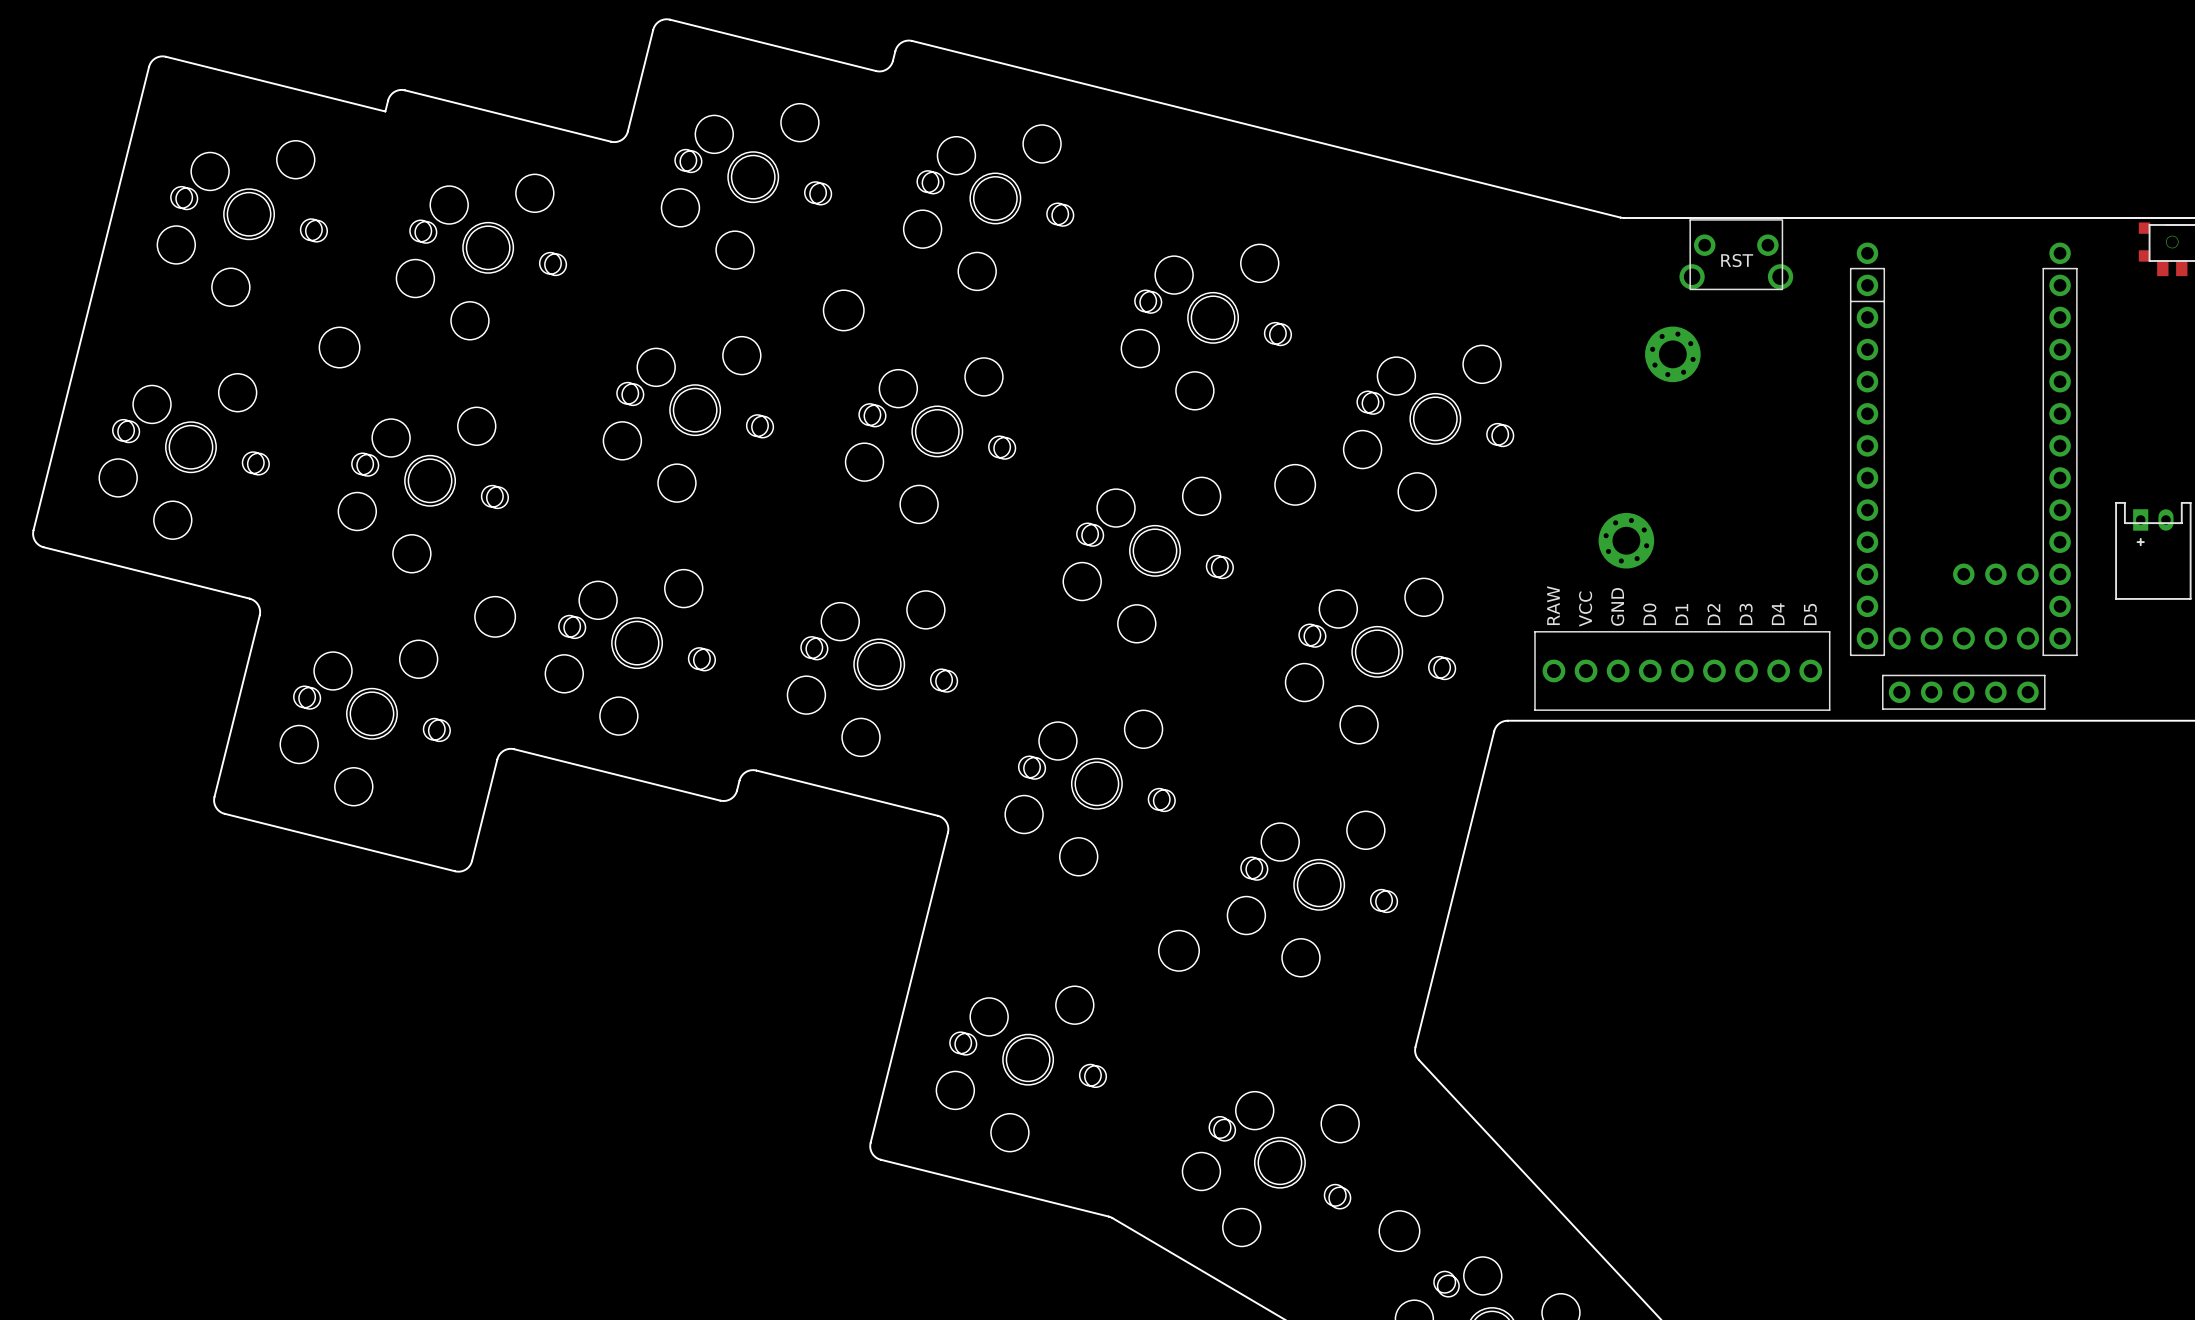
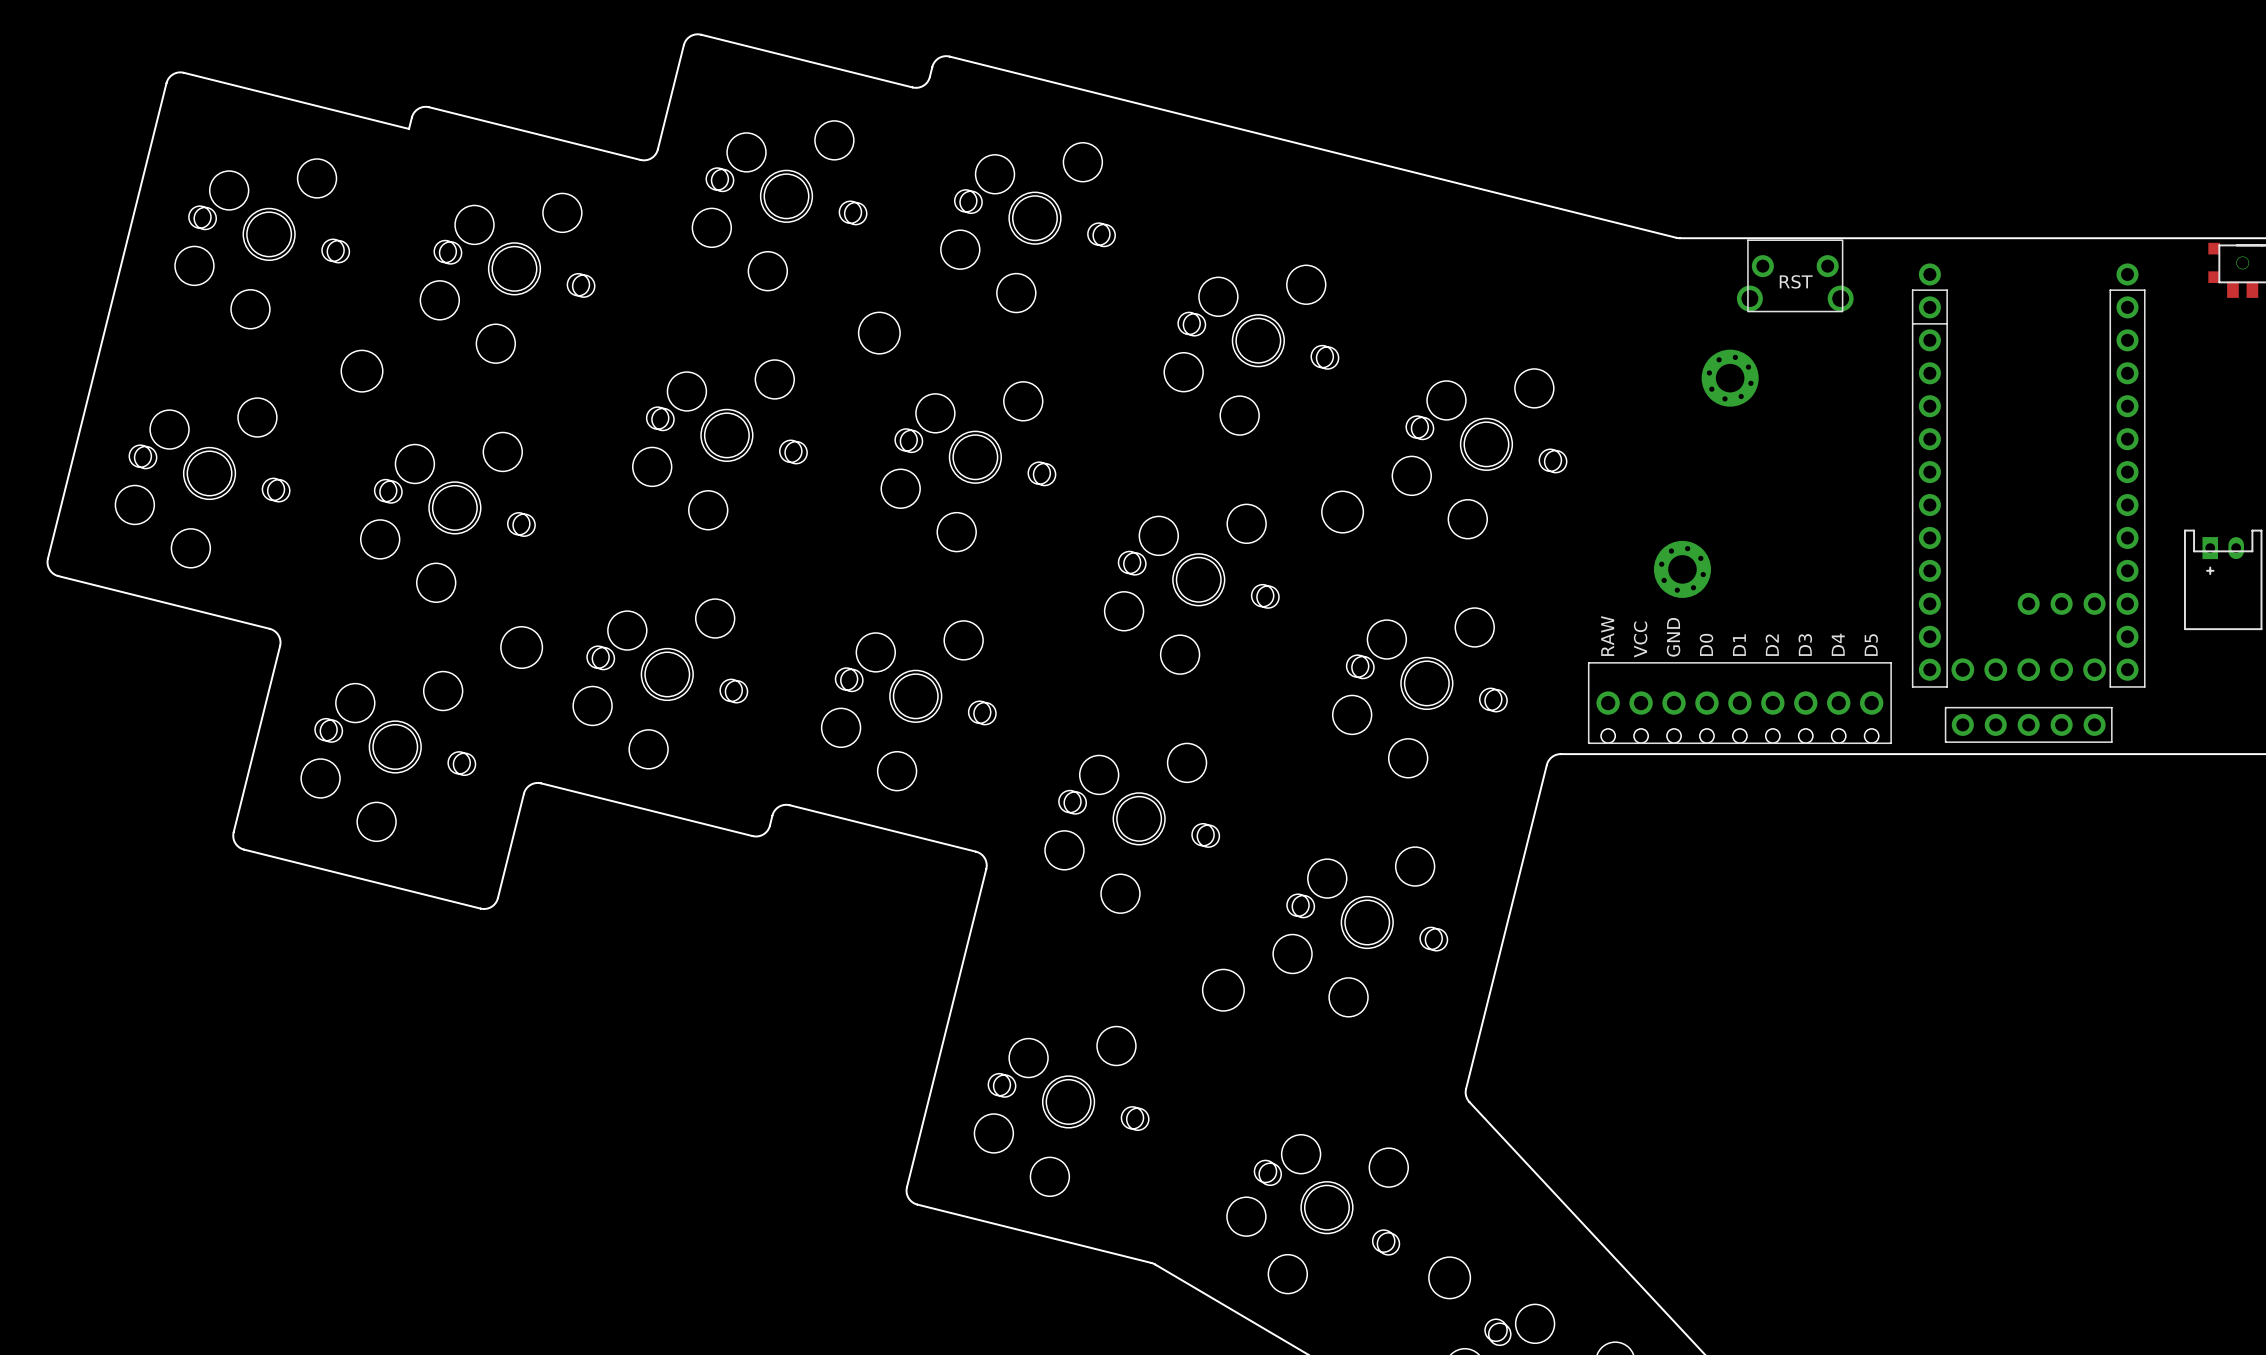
part footprint: [1534, 631, 1831, 711] -> [1587, 662, 1892, 745]

